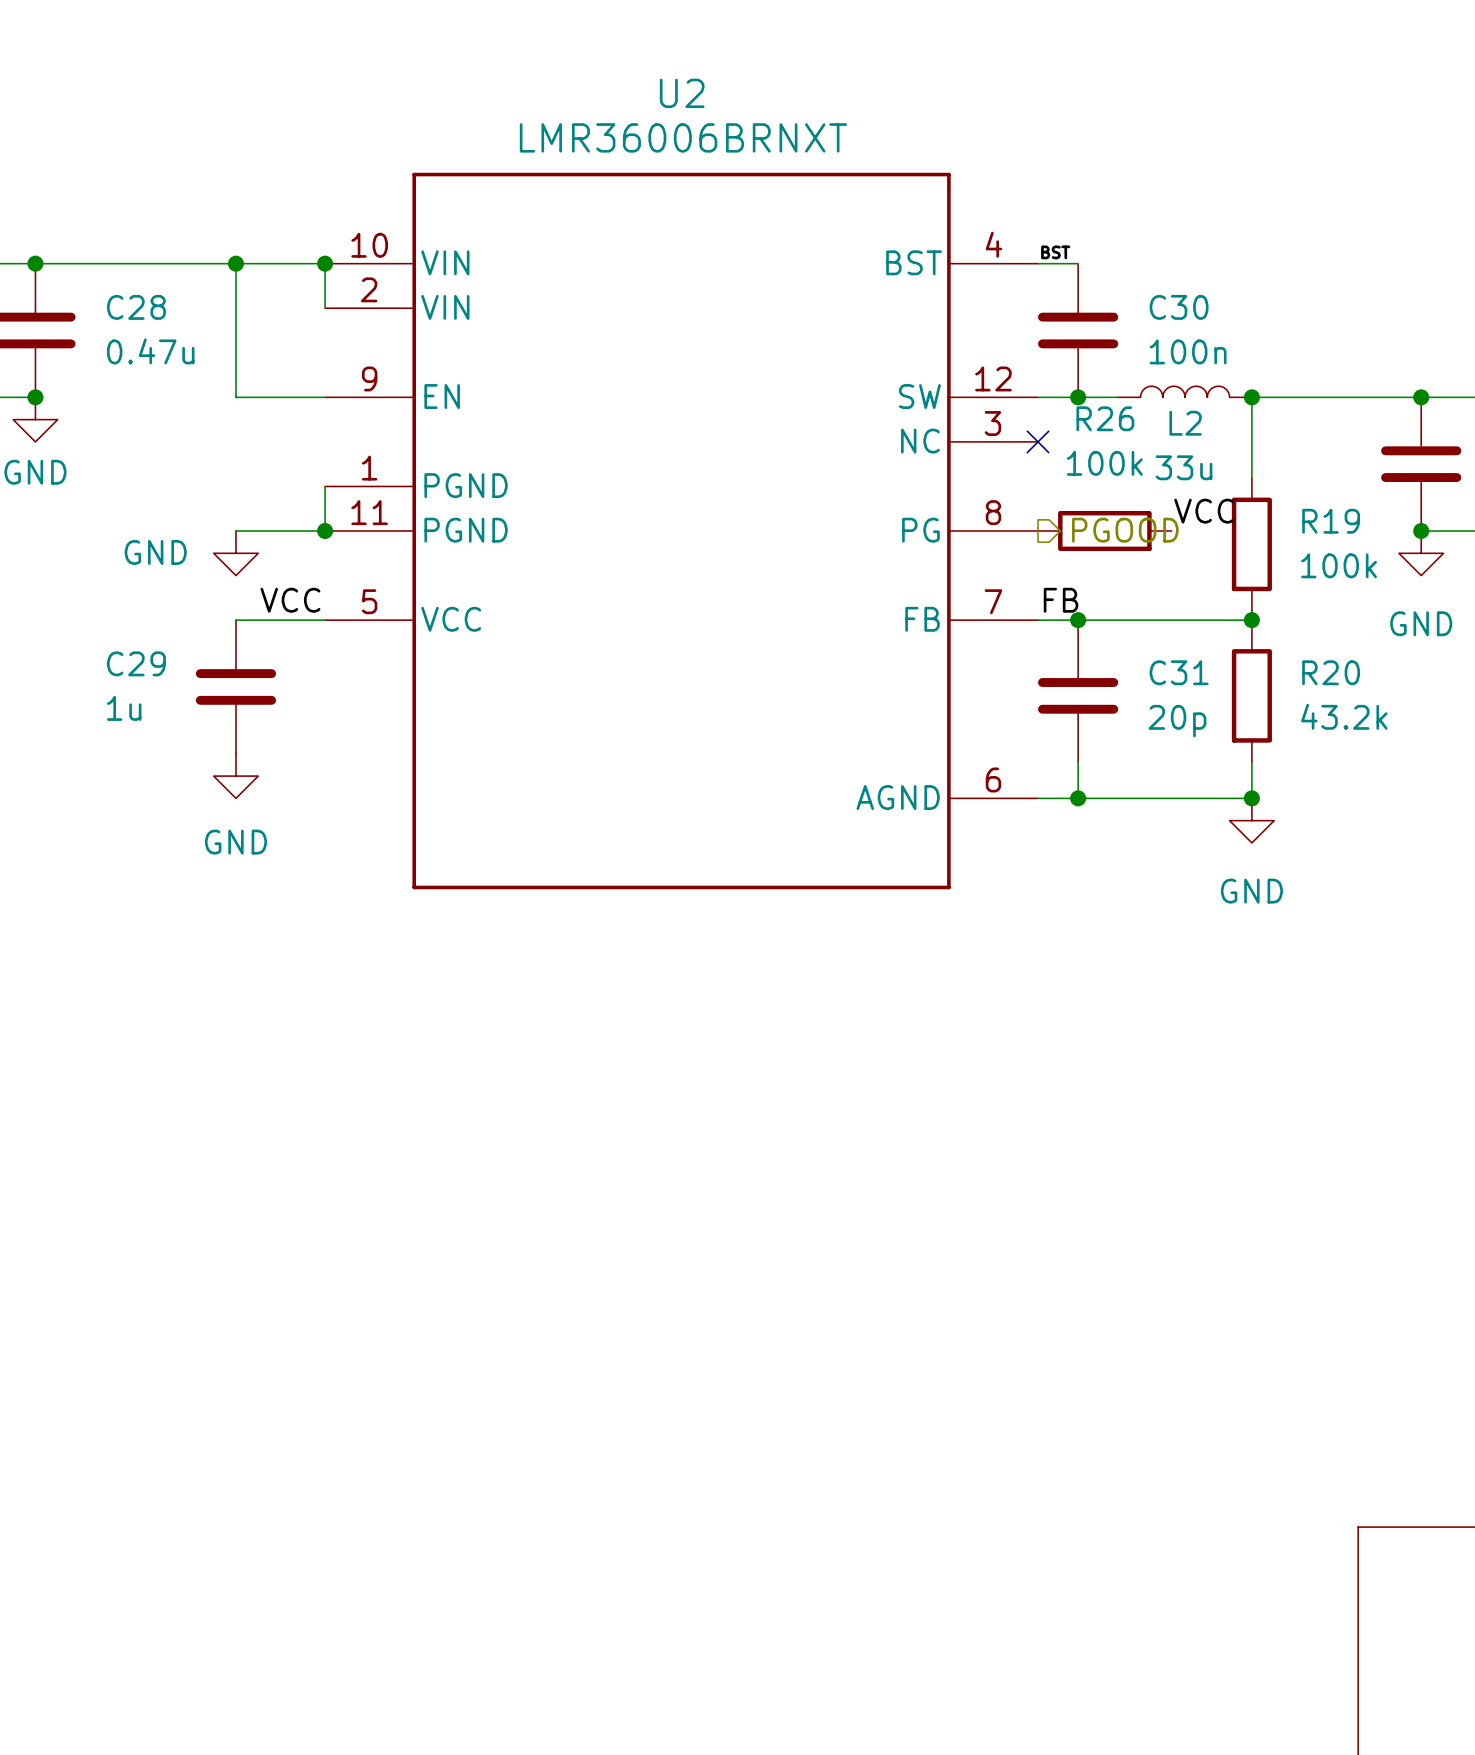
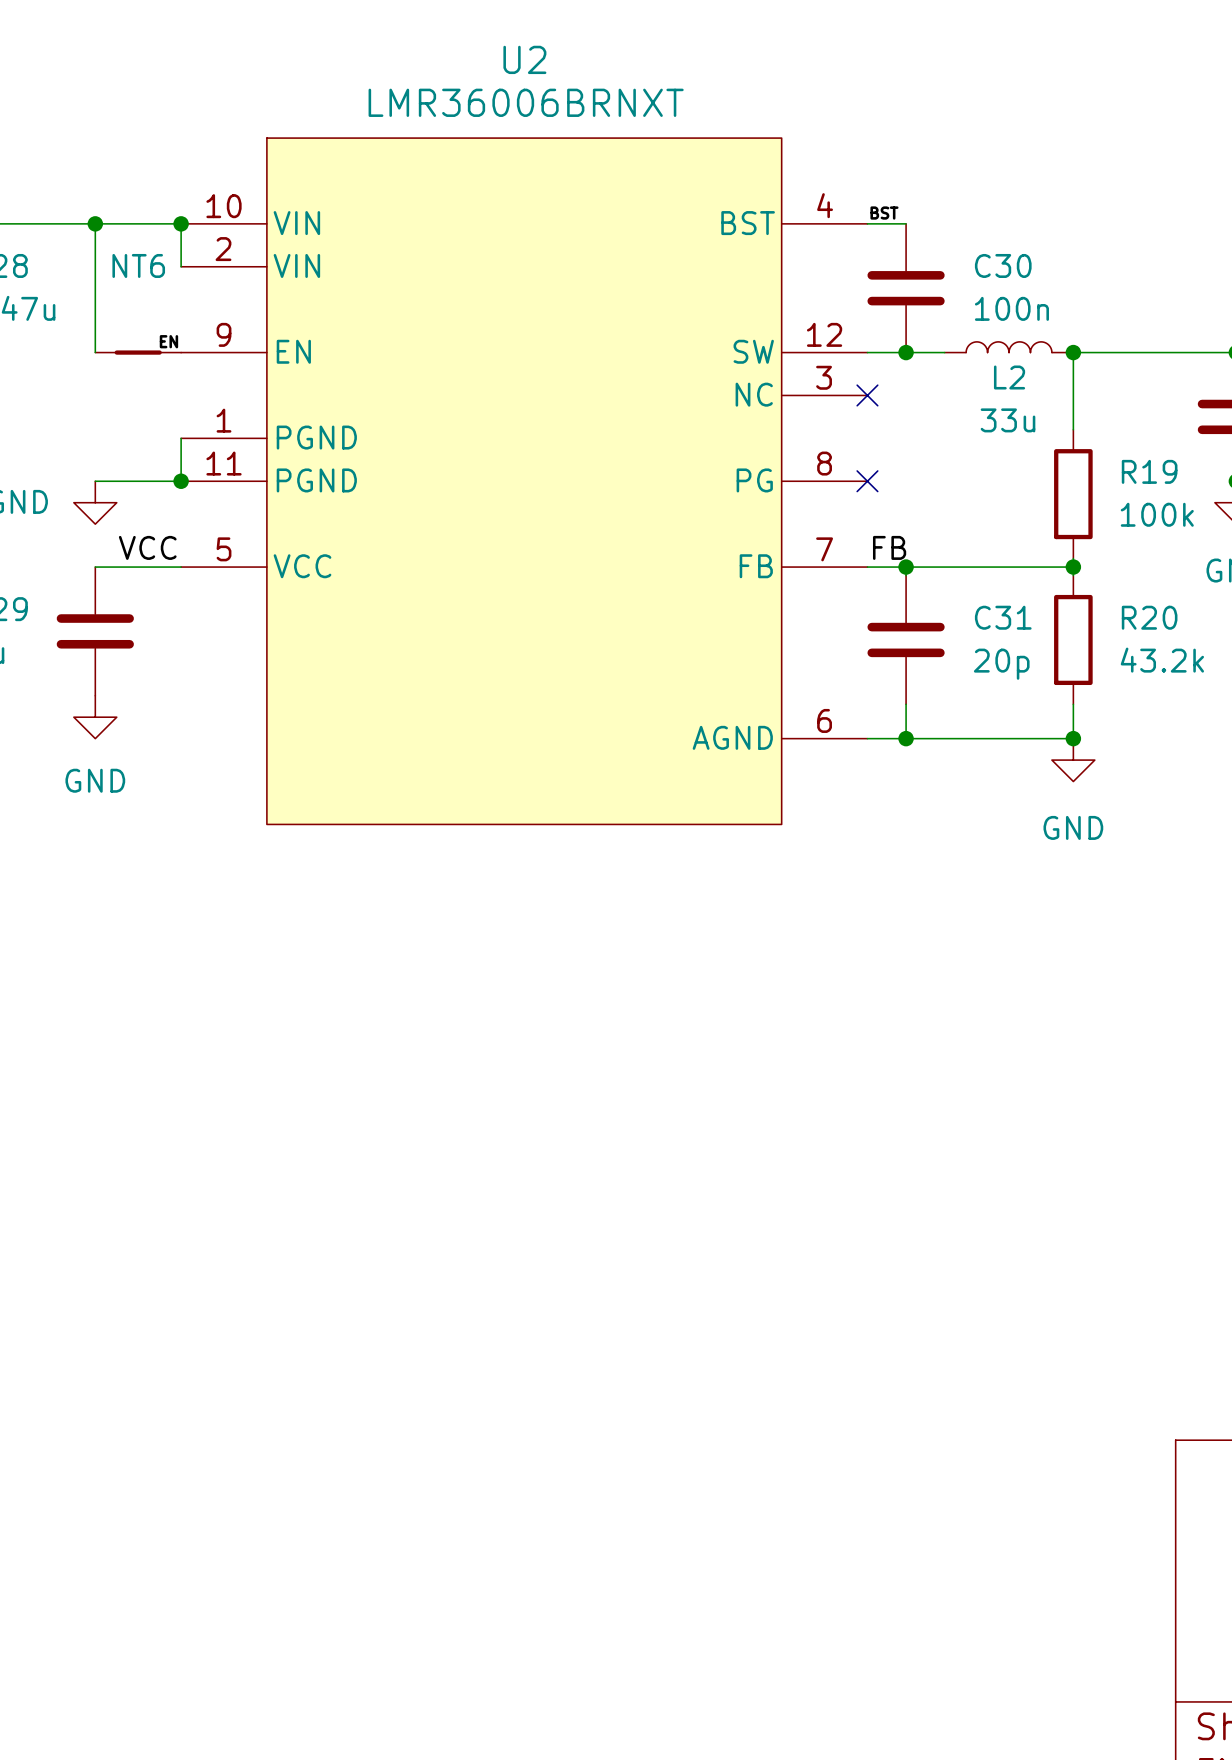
U2 symbol: [325, 172, 1039, 890] -> [181, 138, 868, 825]
label: none -> EN (168, 341)
NT6: none -> (138, 352)
label: VCC (1204, 511) -> none
hierarchical label: PGOOD (1125, 530) -> none
no-connect mark: none -> (867, 481)
R26: 100k (1104, 531) -> none

